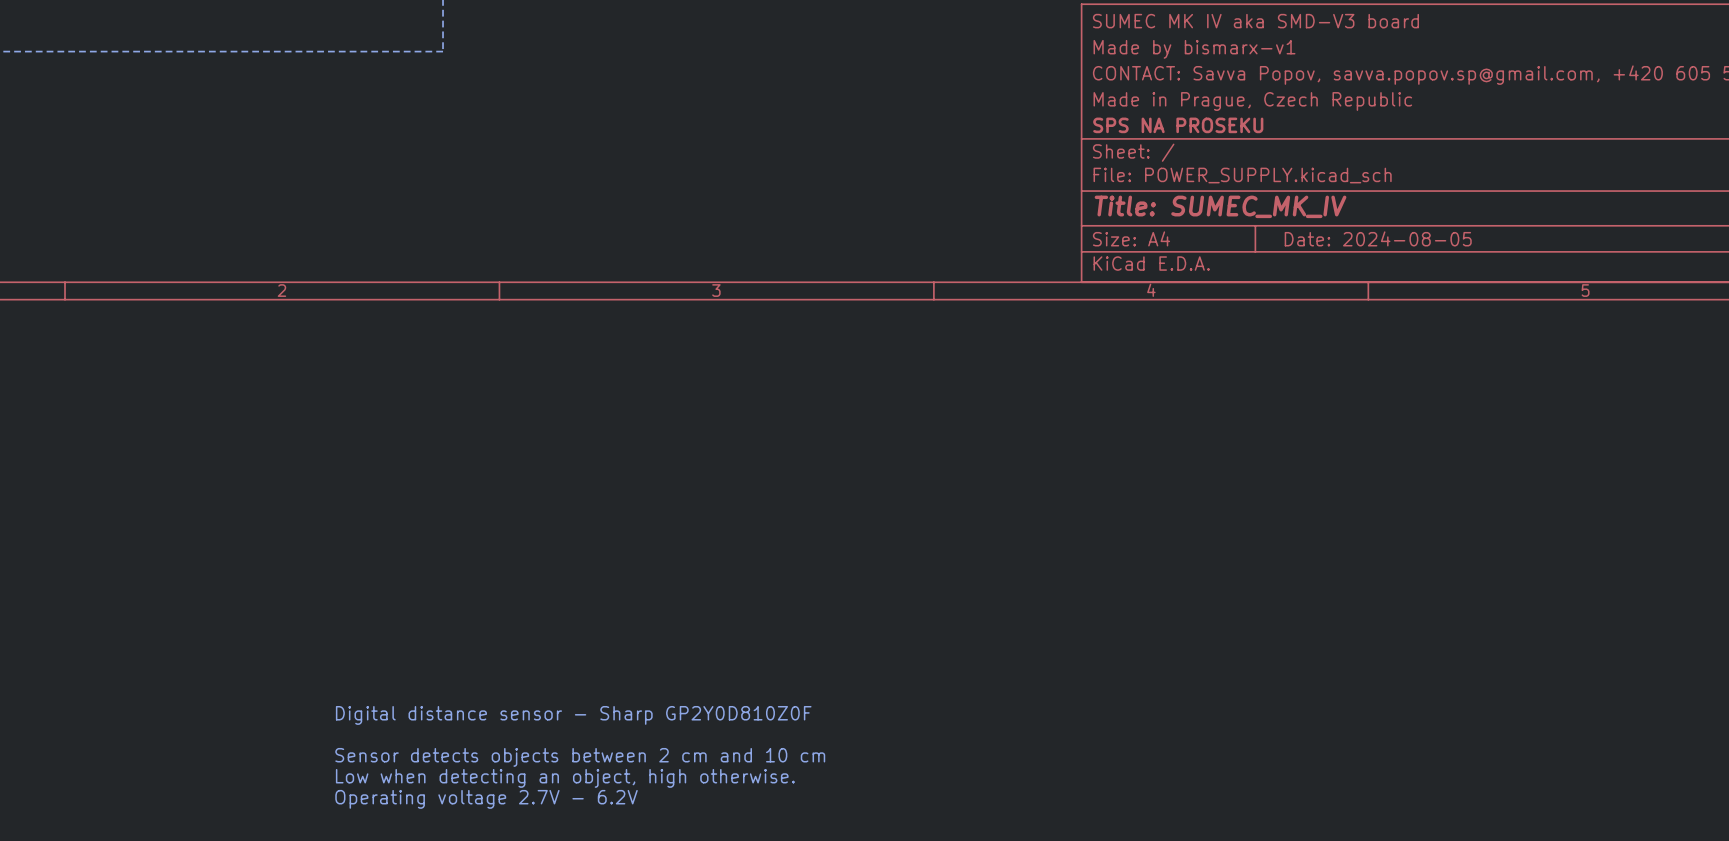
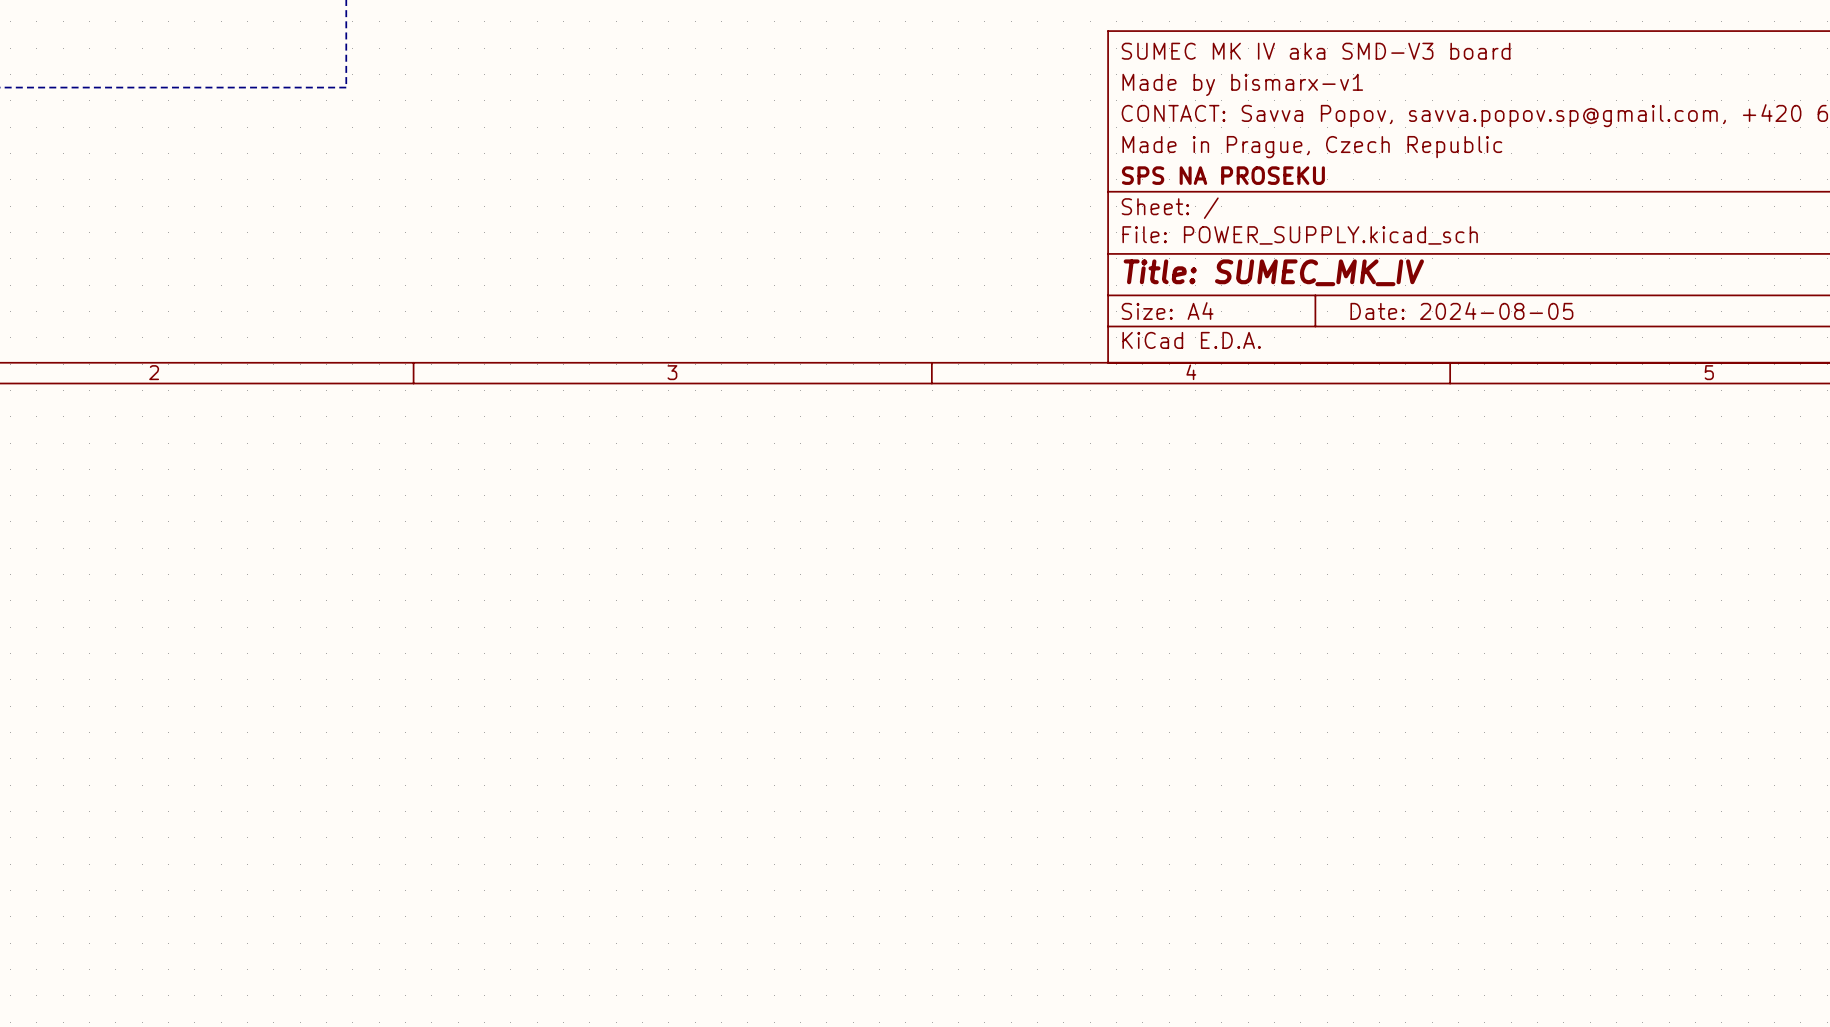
text: Digital distance sensor - Sharp GP2Y0D810Z0F (573, 715) -> none
text: Sensor detects objects between 2 cm and 10 cm (580, 757) -> none
text: Low when detecting an object, high otherwise. (565, 778) -> none
text: Operating voltage 2.7V - 6.2V (486, 799) -> none

